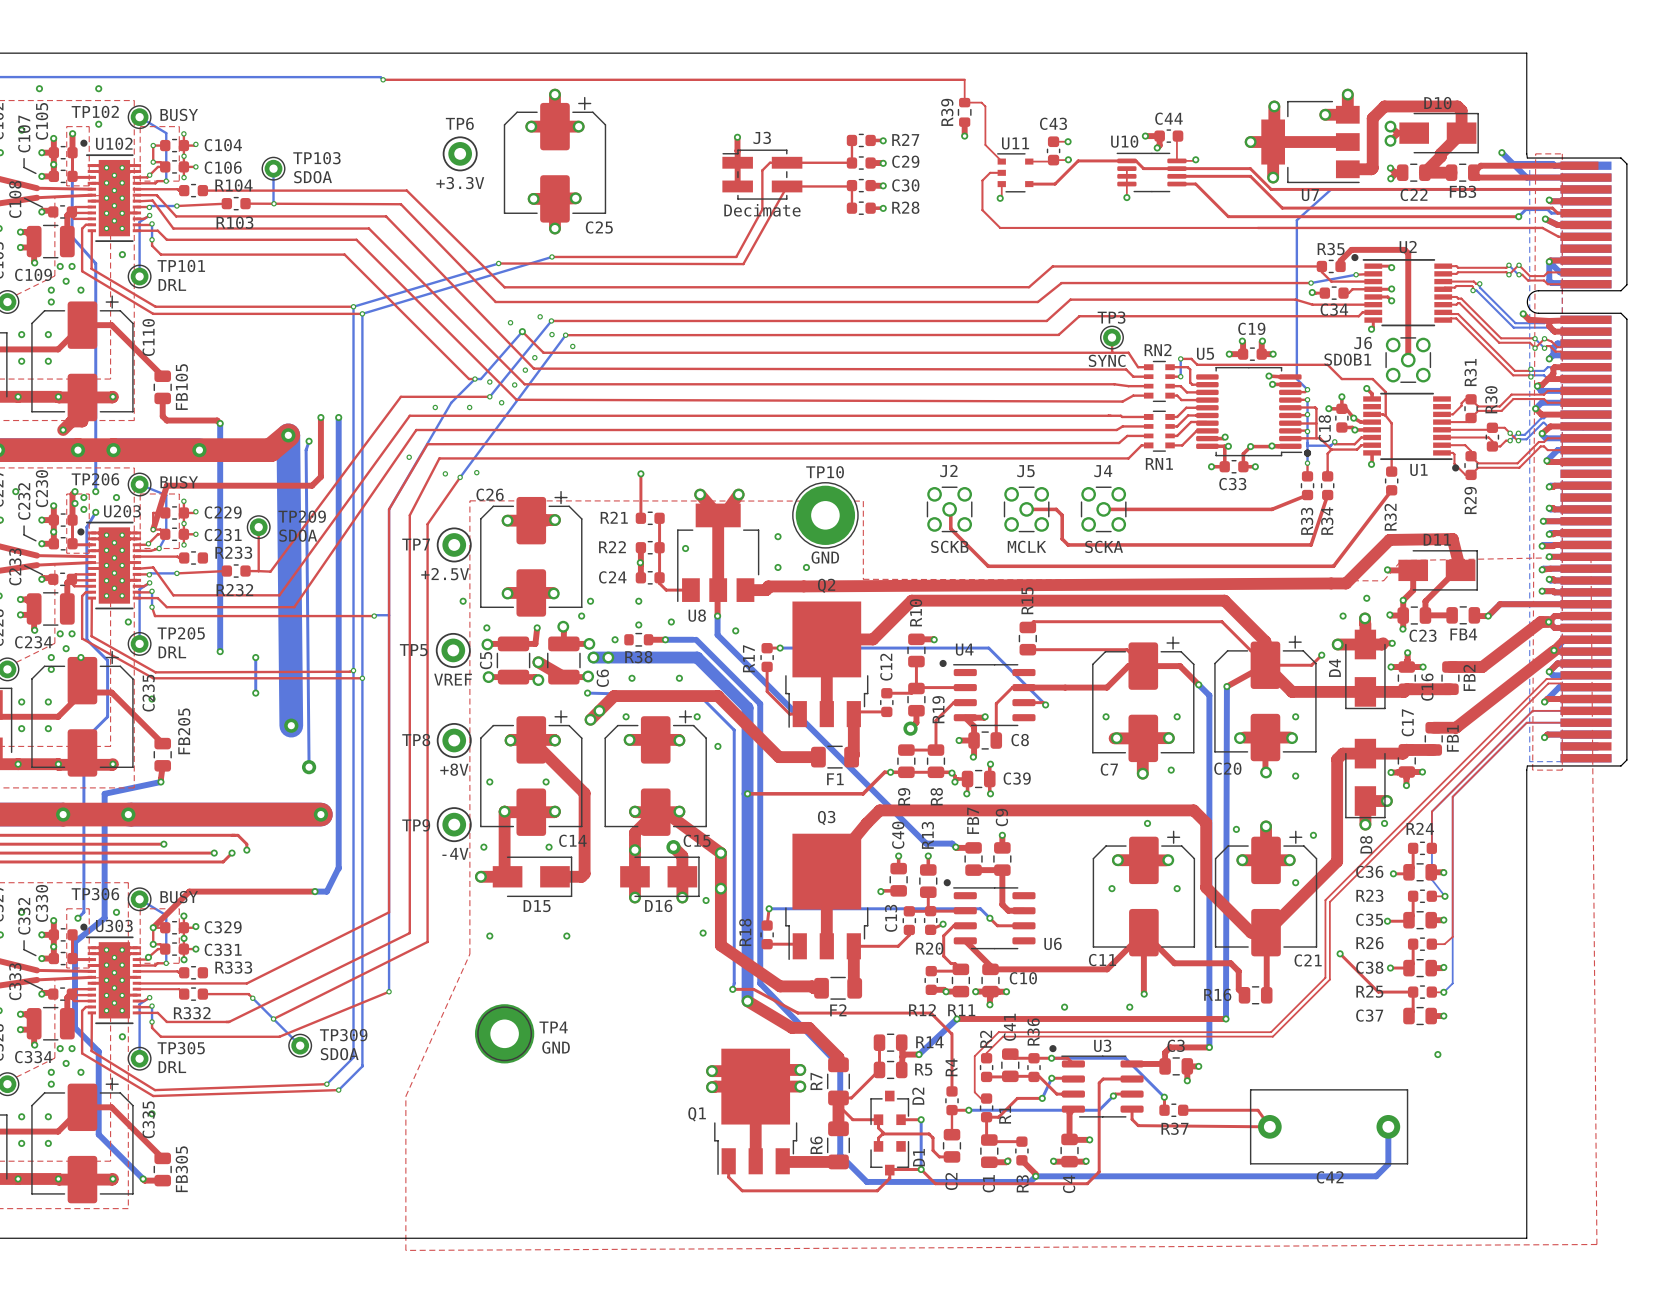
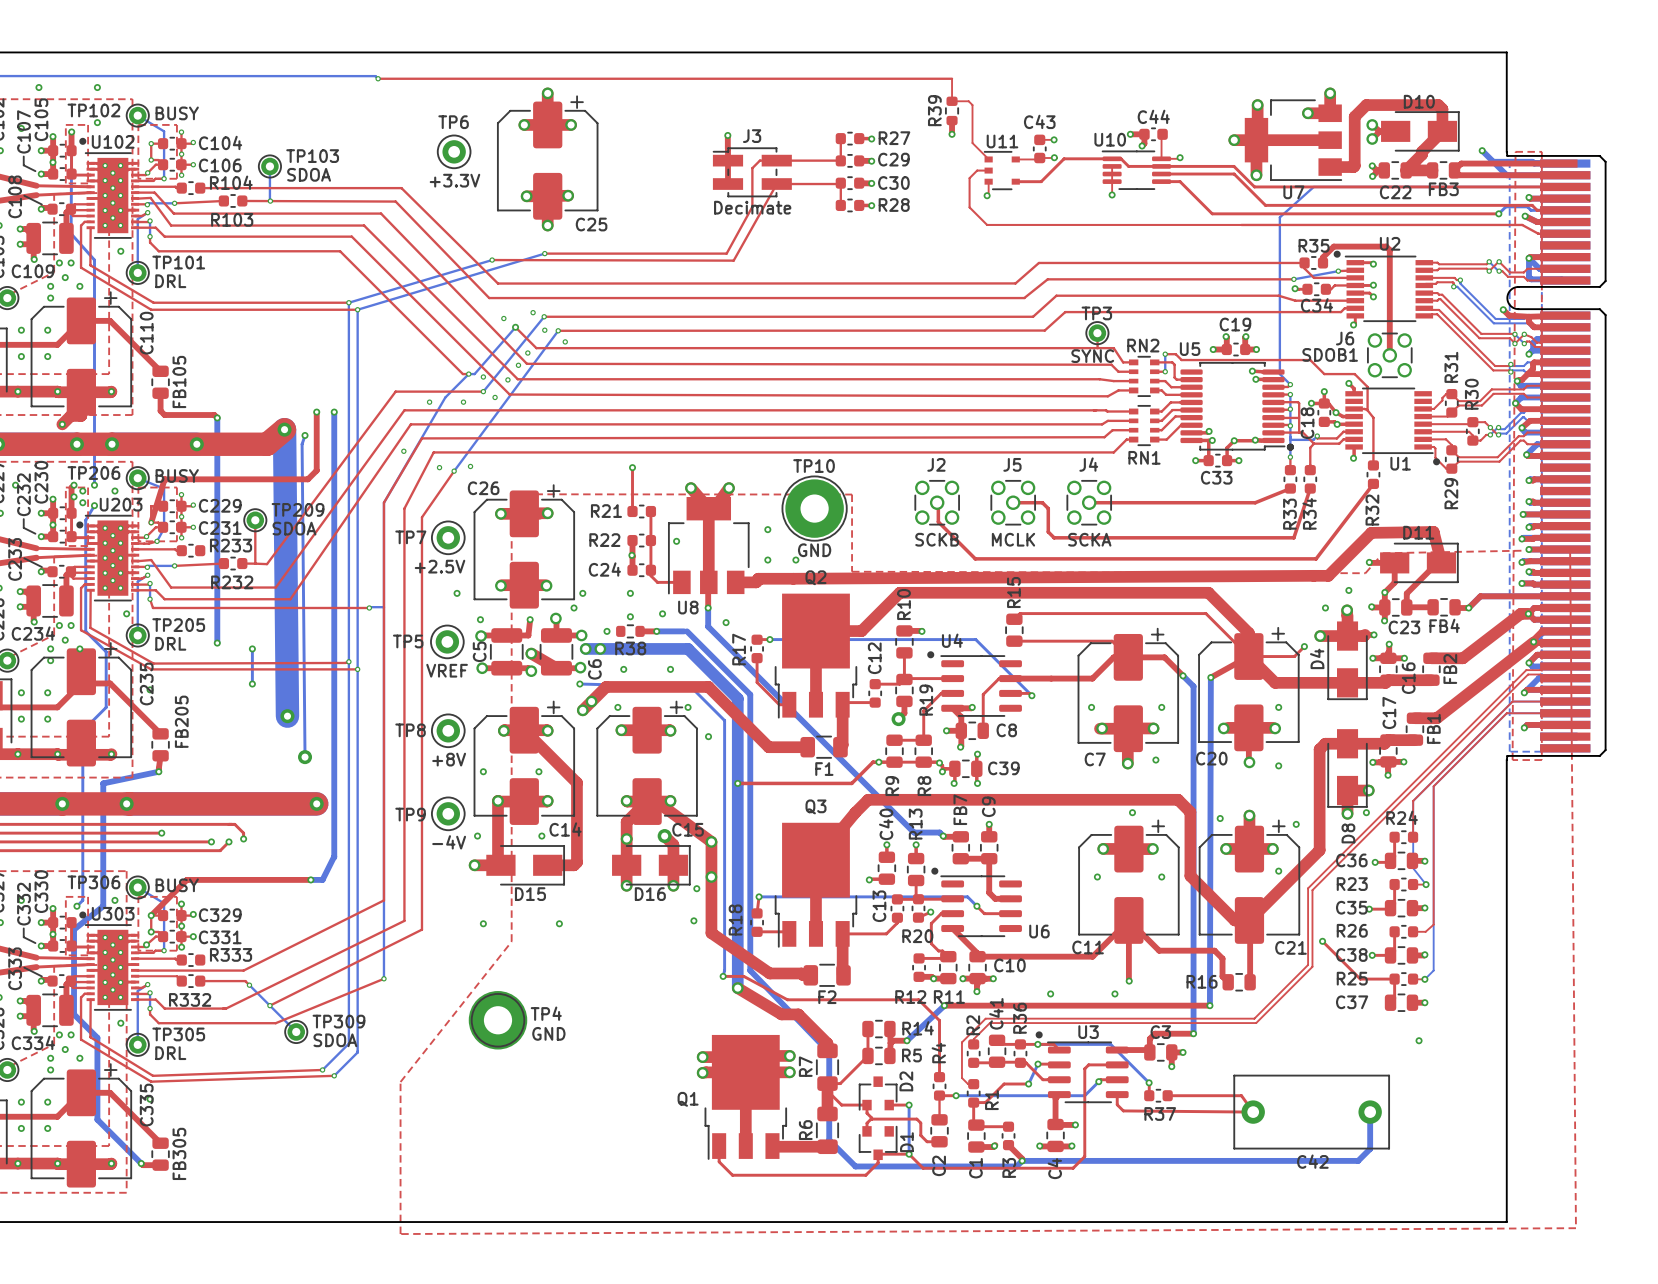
top zone outline: (863, 501) (469, 500) (469, 954) (405, 1096) -> (852, 494) (511, 494) (511, 941) (400, 1082)

